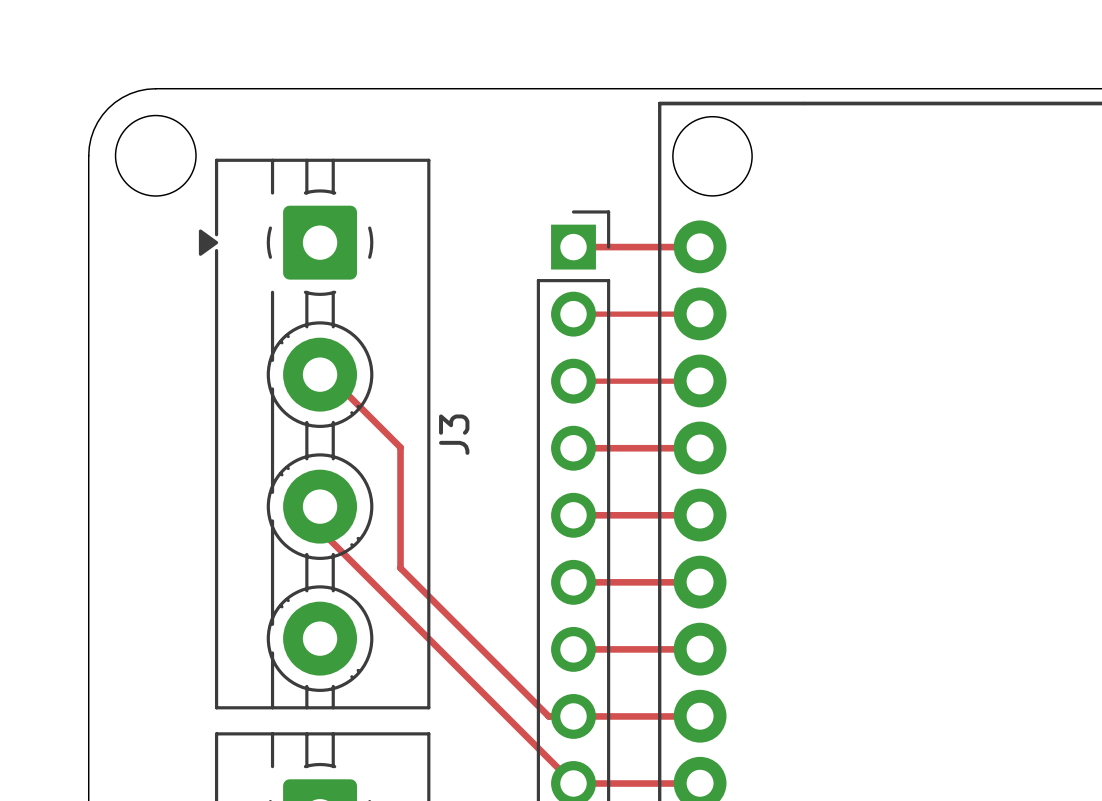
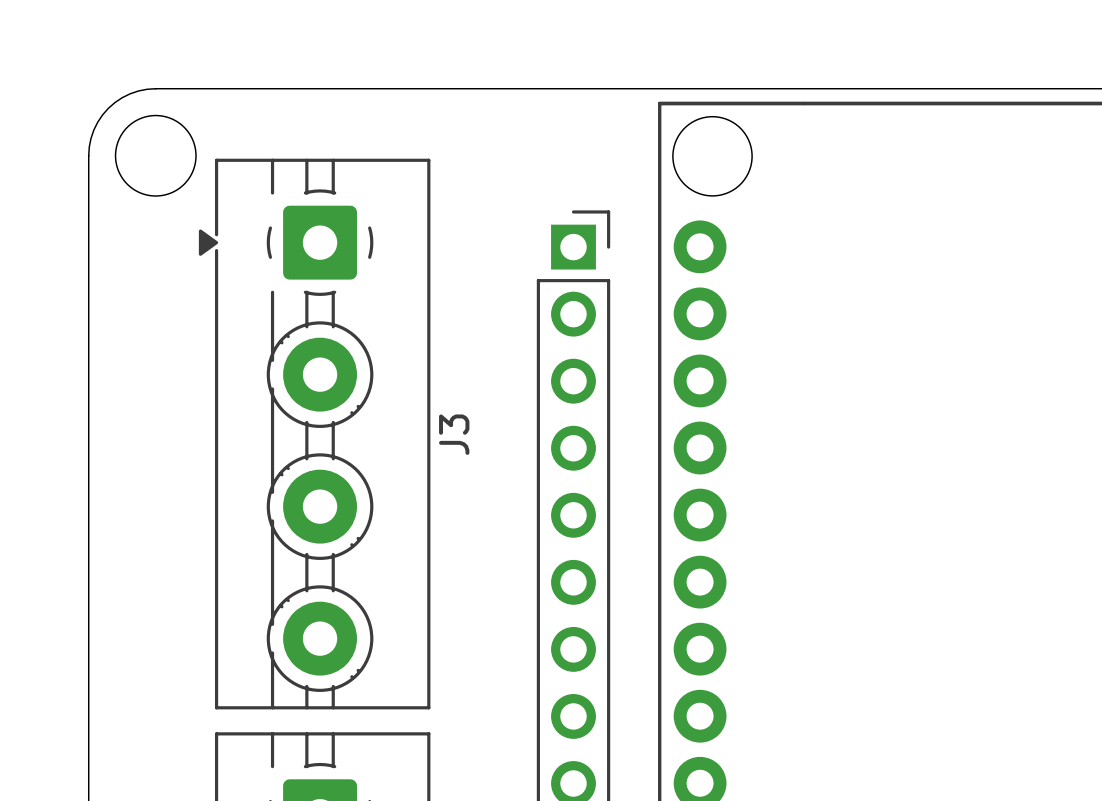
track: (573, 247) (699, 247) -> none
track: (573, 314) (699, 314) -> none
track: (320, 374) (327, 374) (400, 447) (400, 568) (548, 716) (699, 716) -> none
track: (573, 381) (699, 381) -> none
track: (573, 448) (699, 448) -> none
track: (320, 506) (320, 530) (573, 783) (699, 783) -> none
track: (573, 515) (699, 515) -> none
track: (573, 582) (699, 582) -> none
track: (573, 649) (699, 649) -> none

